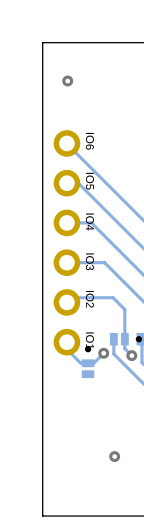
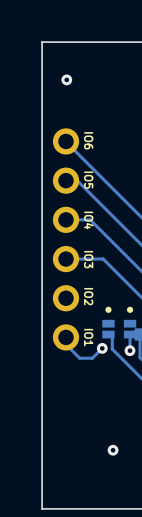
track: (66, 302) (71, 297) (113, 297) (124, 309) (124, 348) (131, 355) -> (130, 334) (130, 350)
part: none -> (108, 322)
part: none -> (130, 322)
part: (126, 339) -> none
part: (88, 362) -> none

